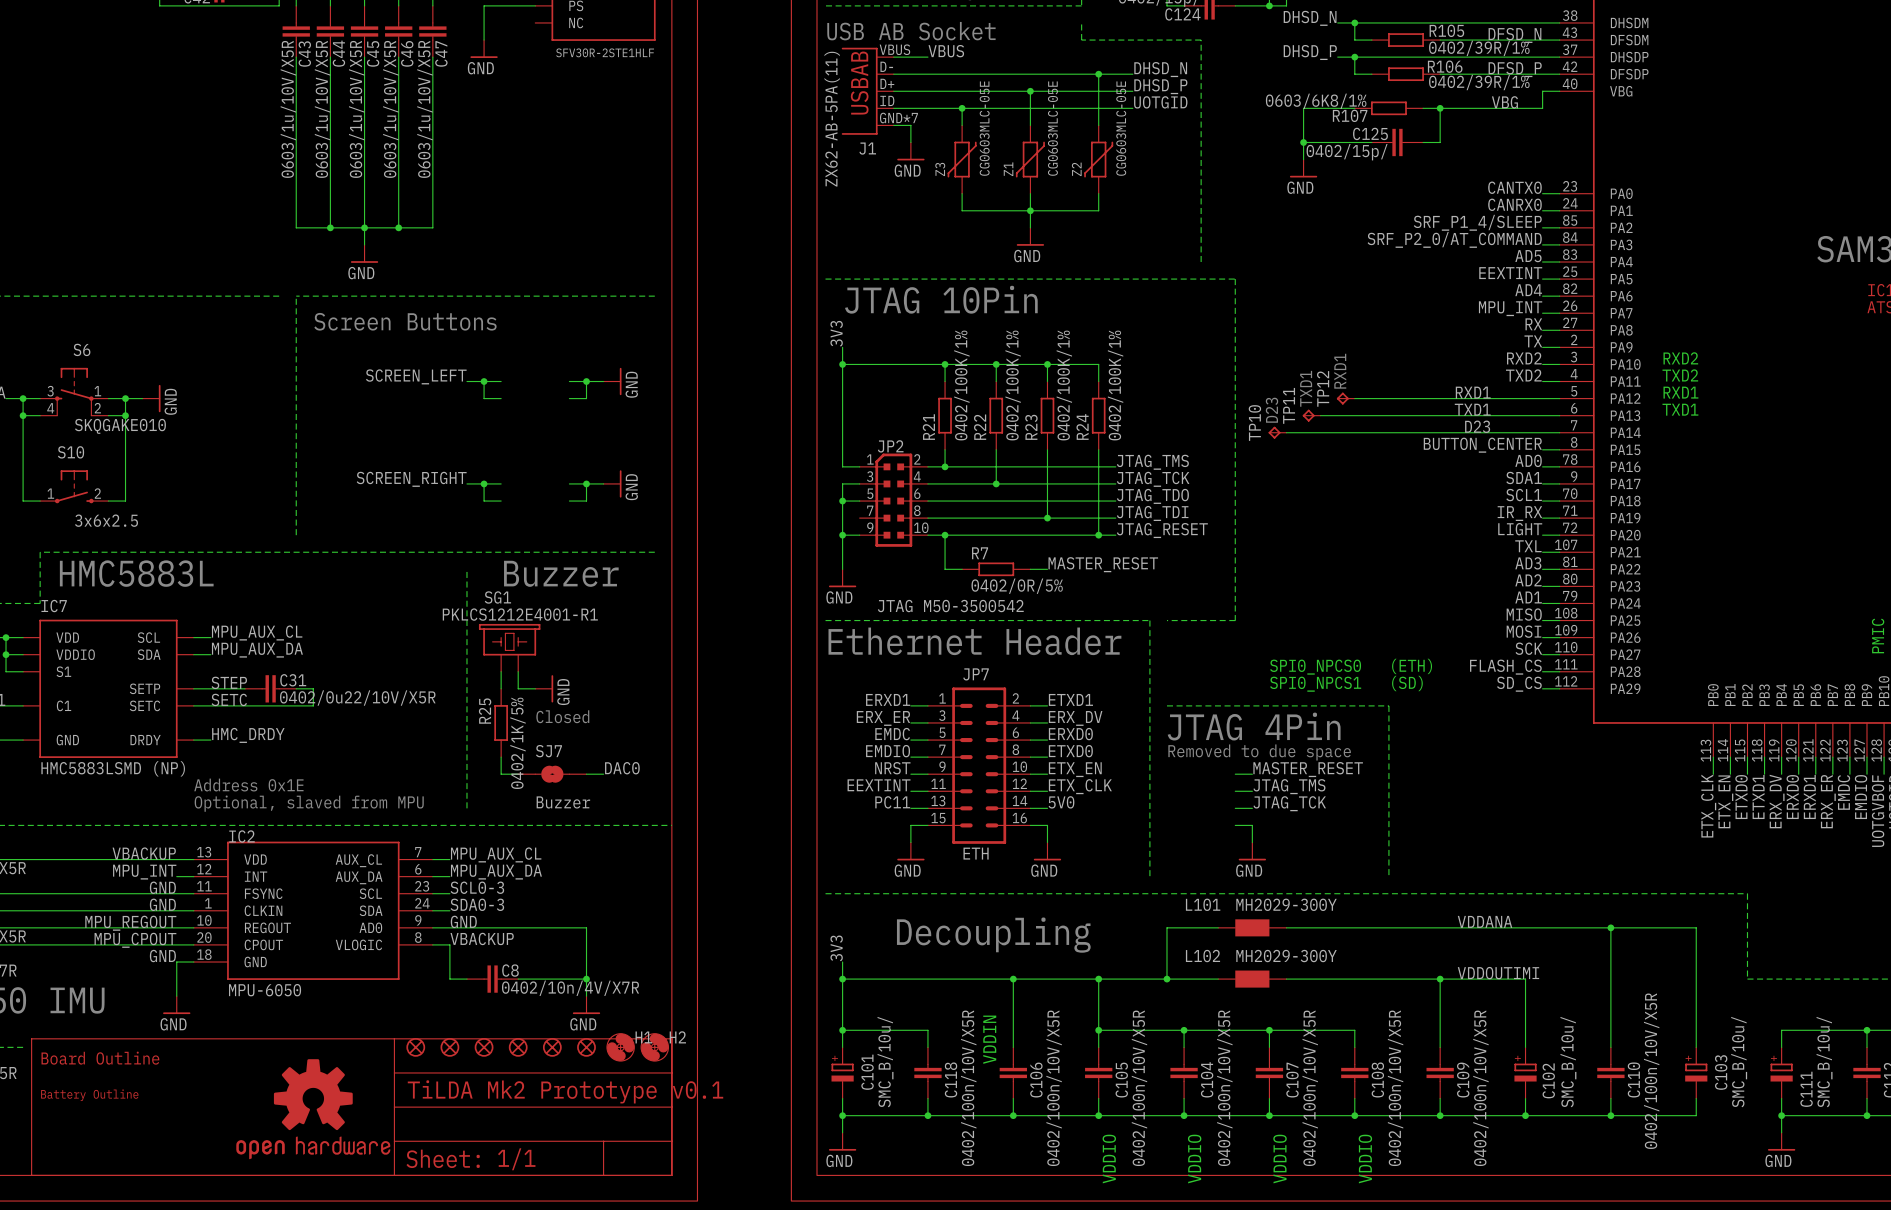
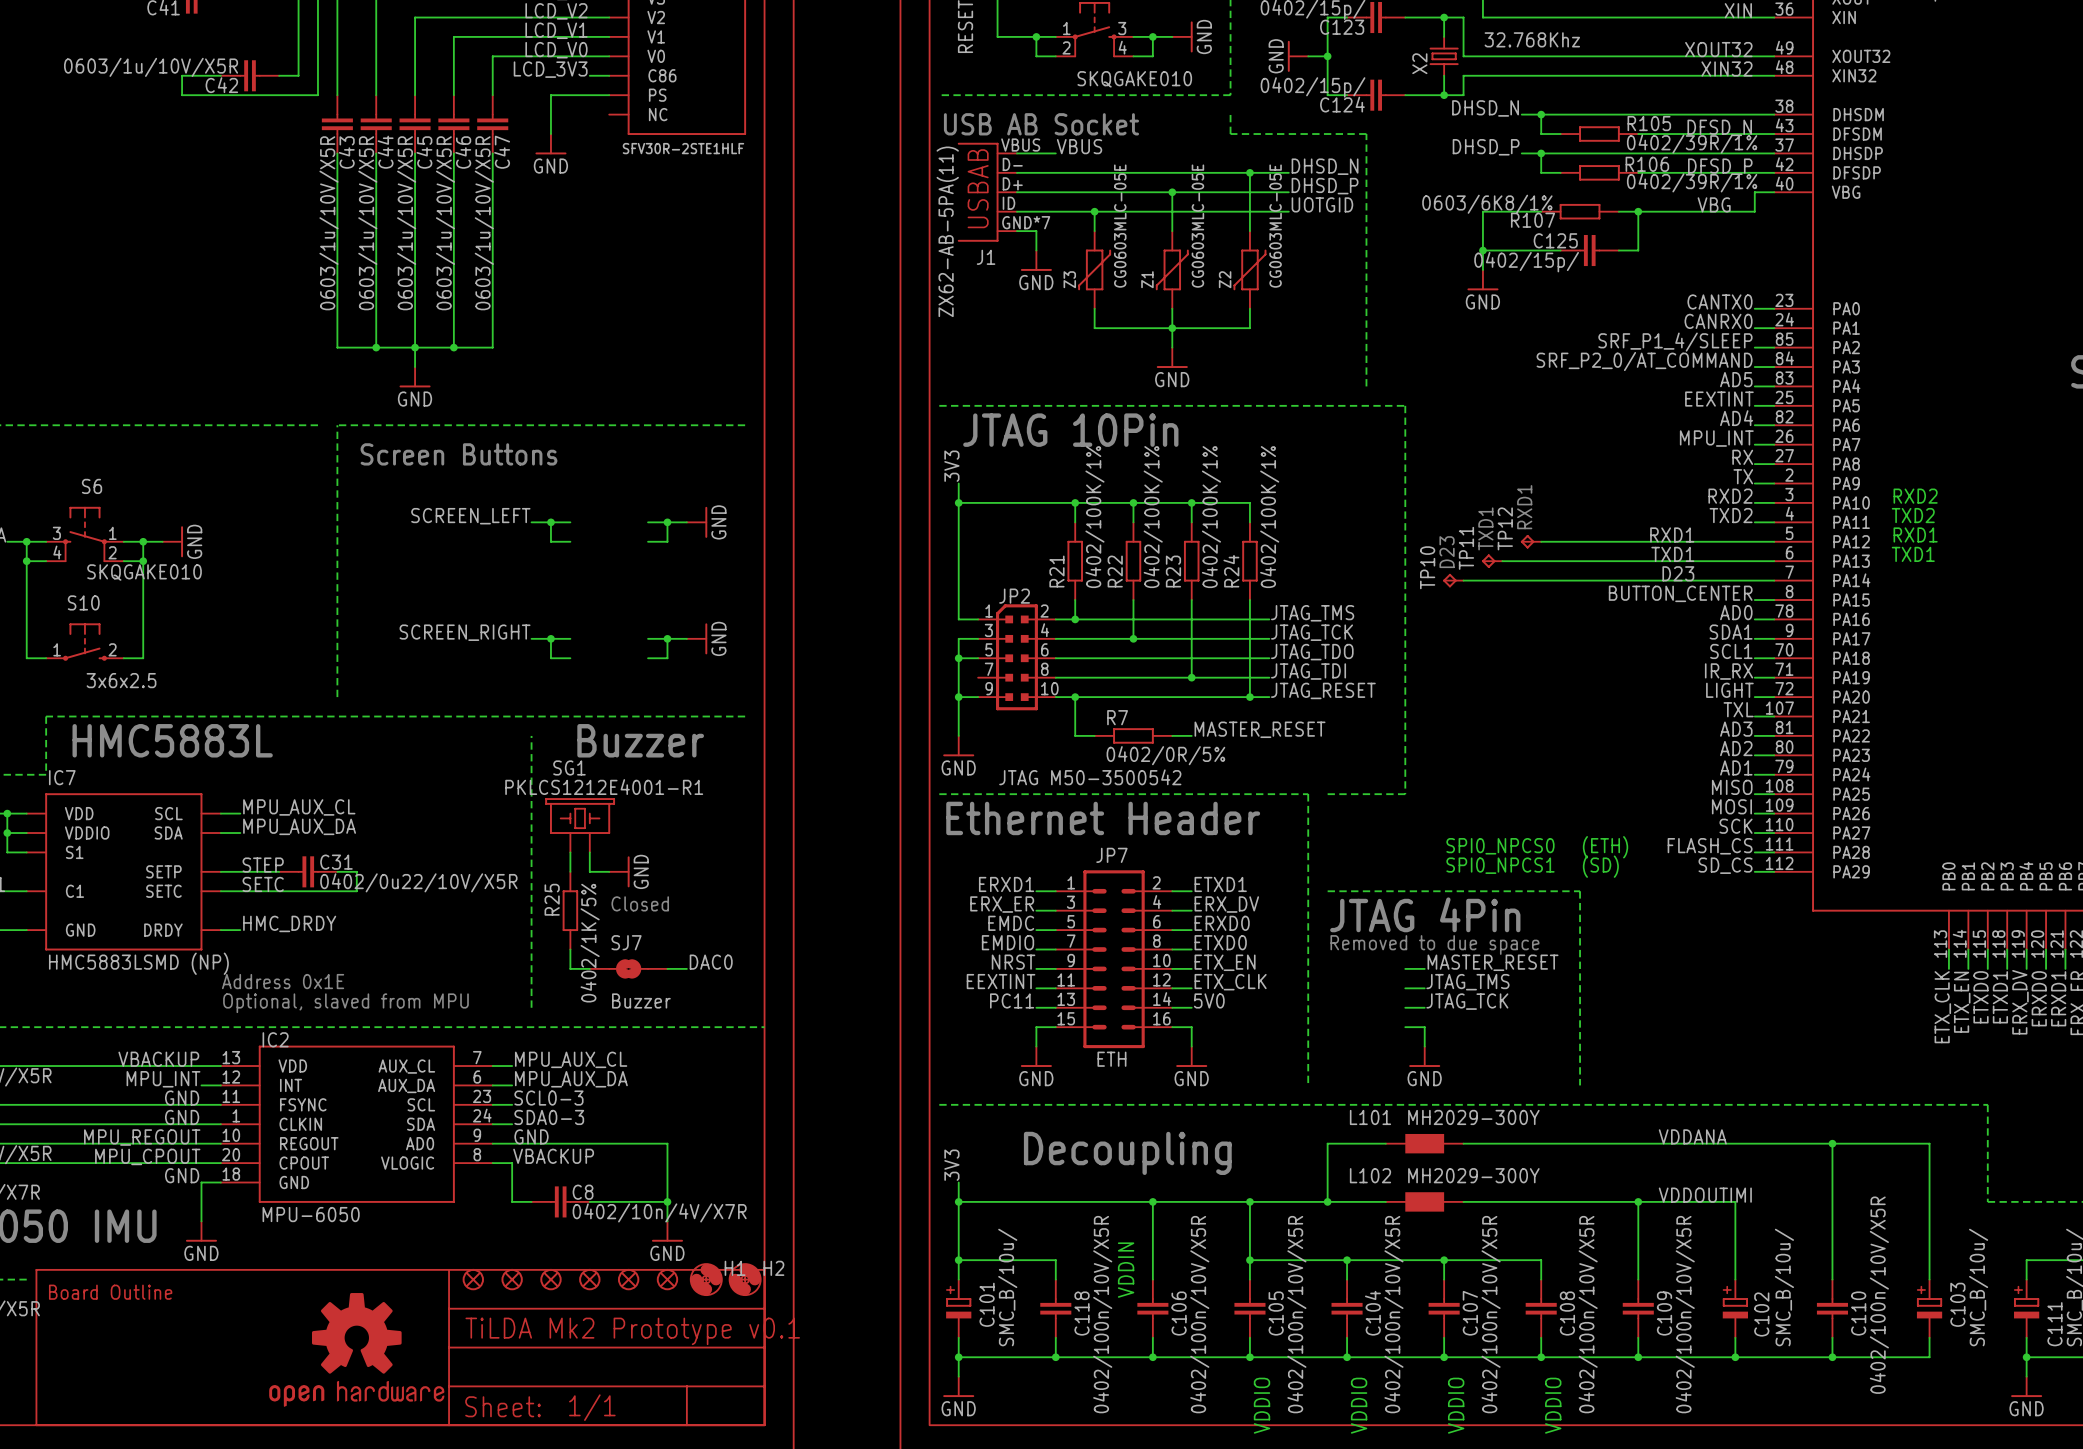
part: (89, 1095) -> none

